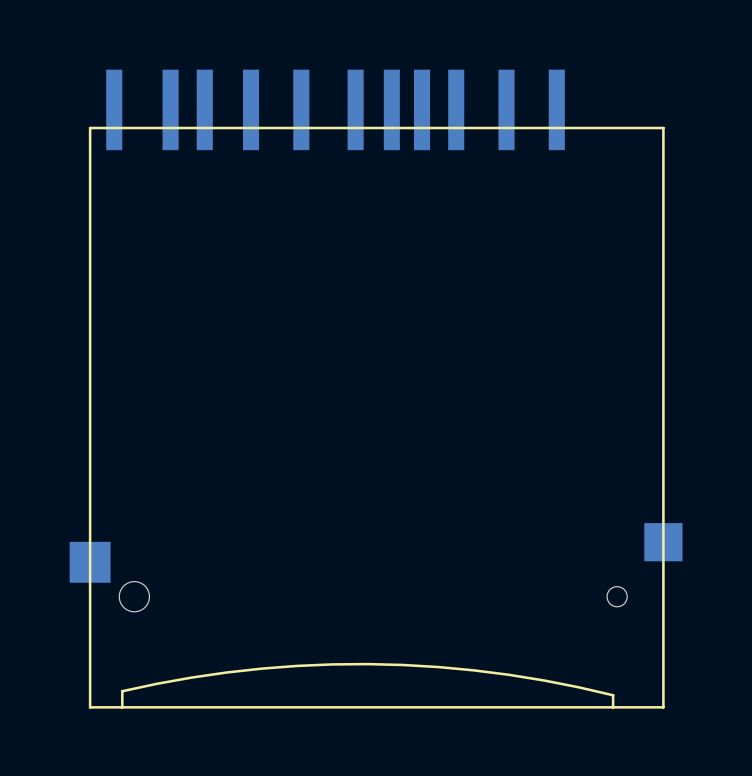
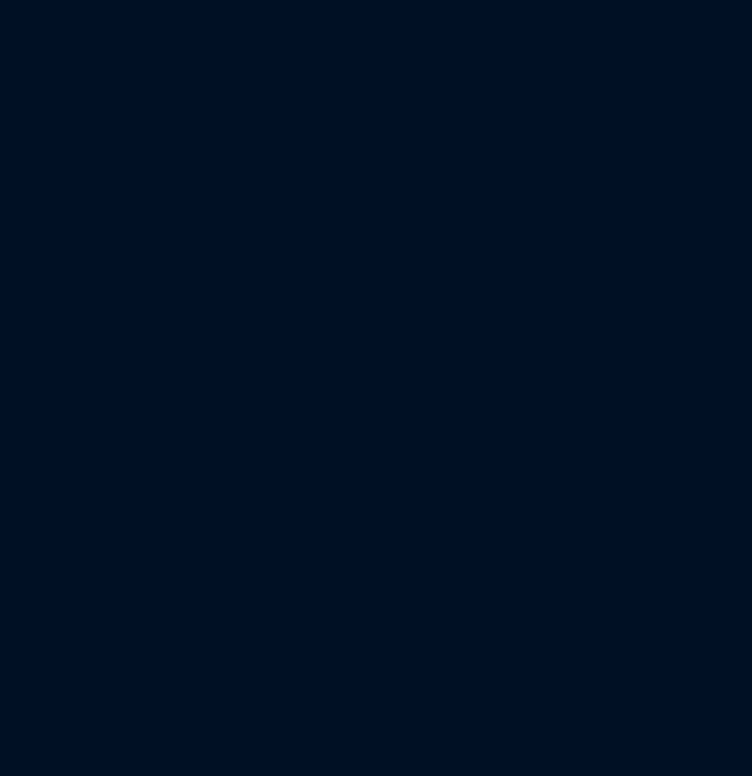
part: (376, 389) -> none

